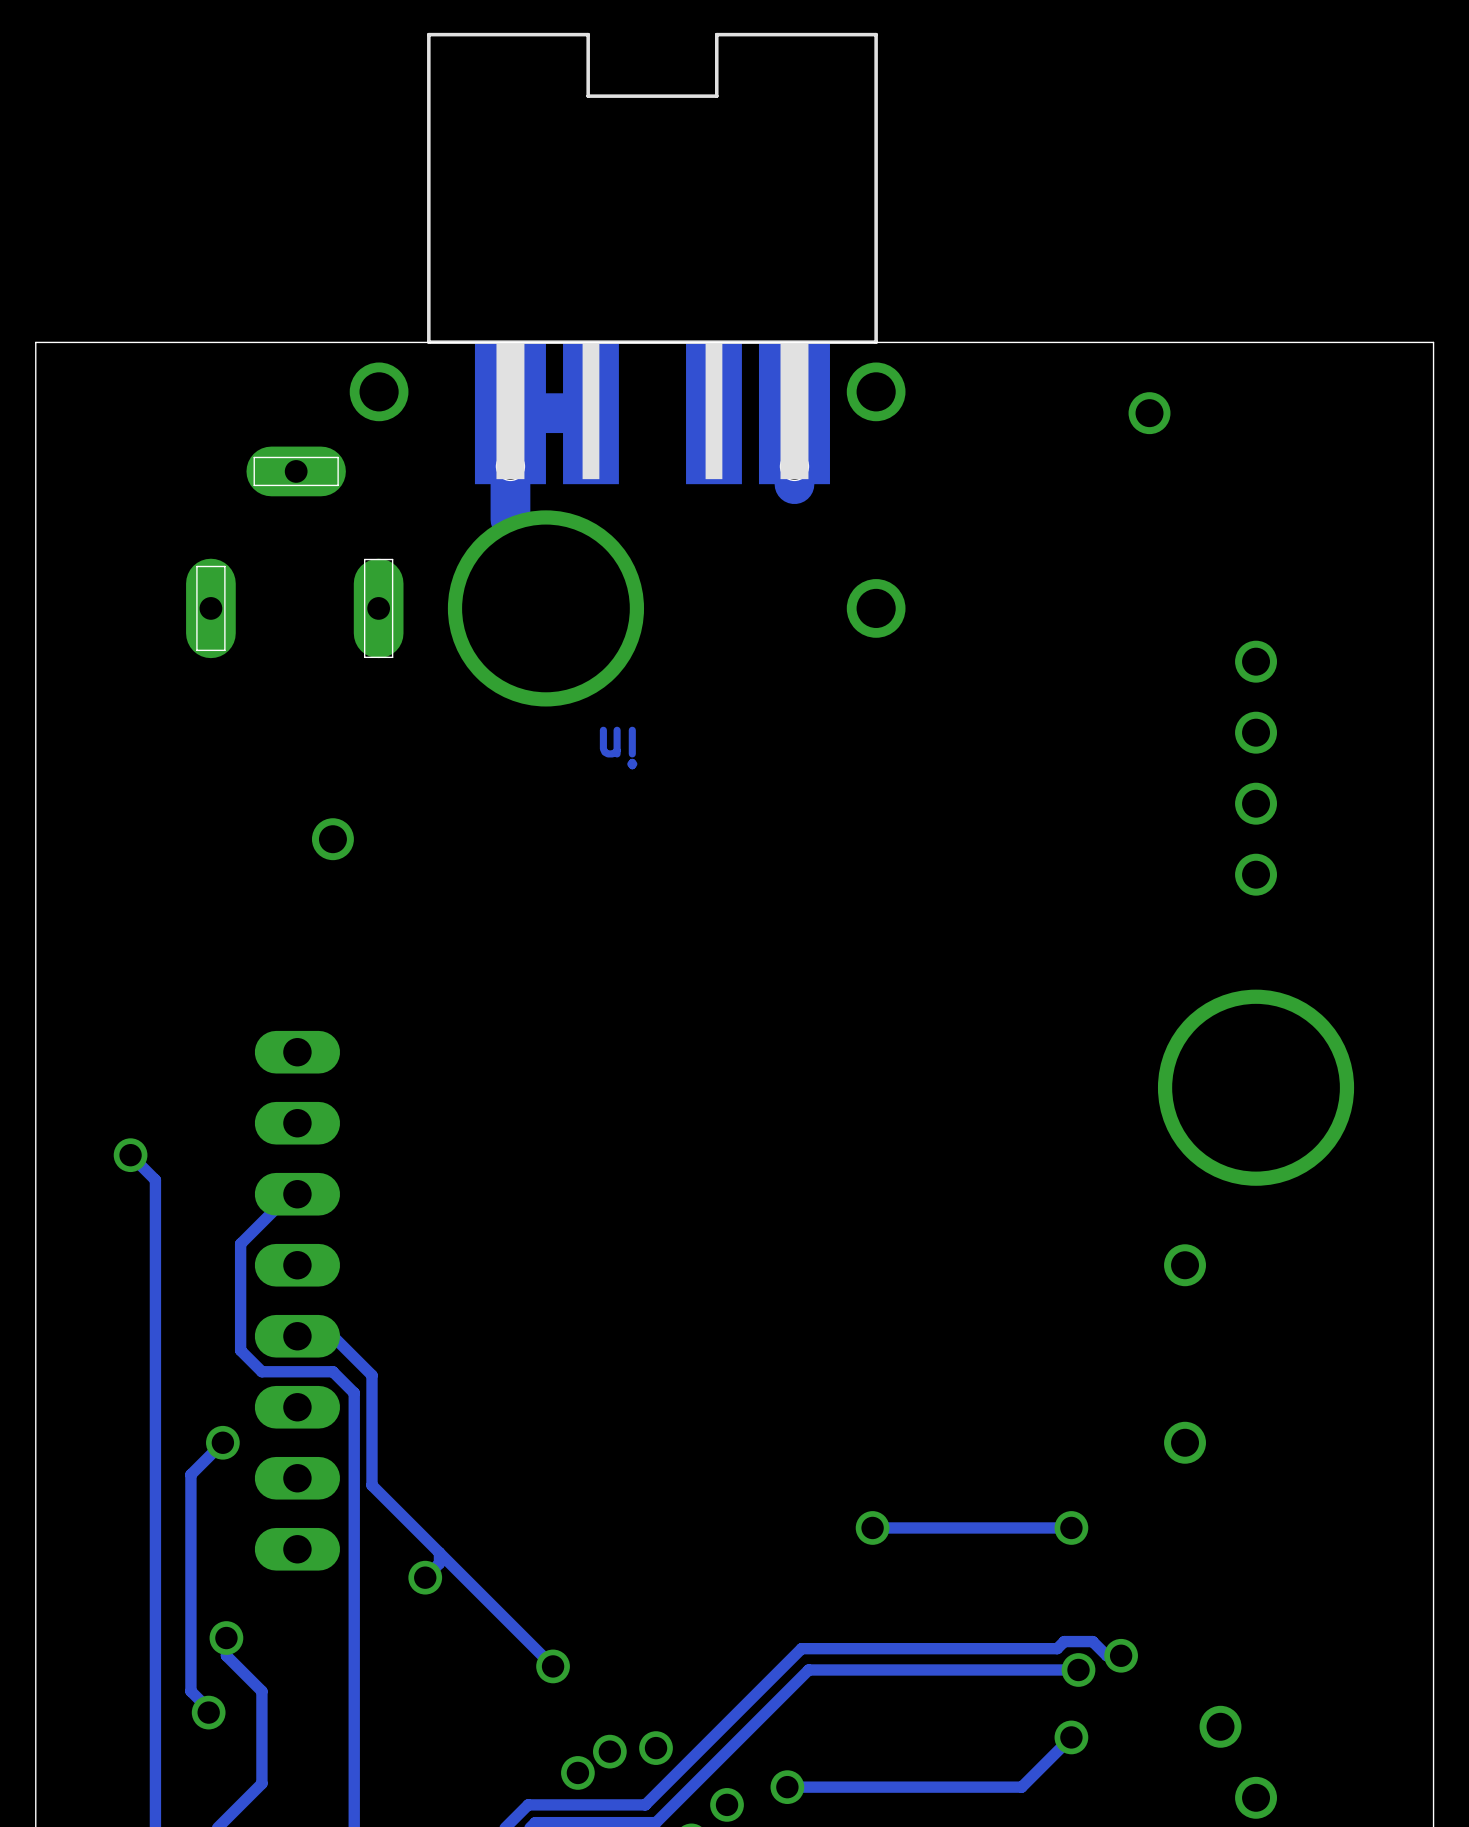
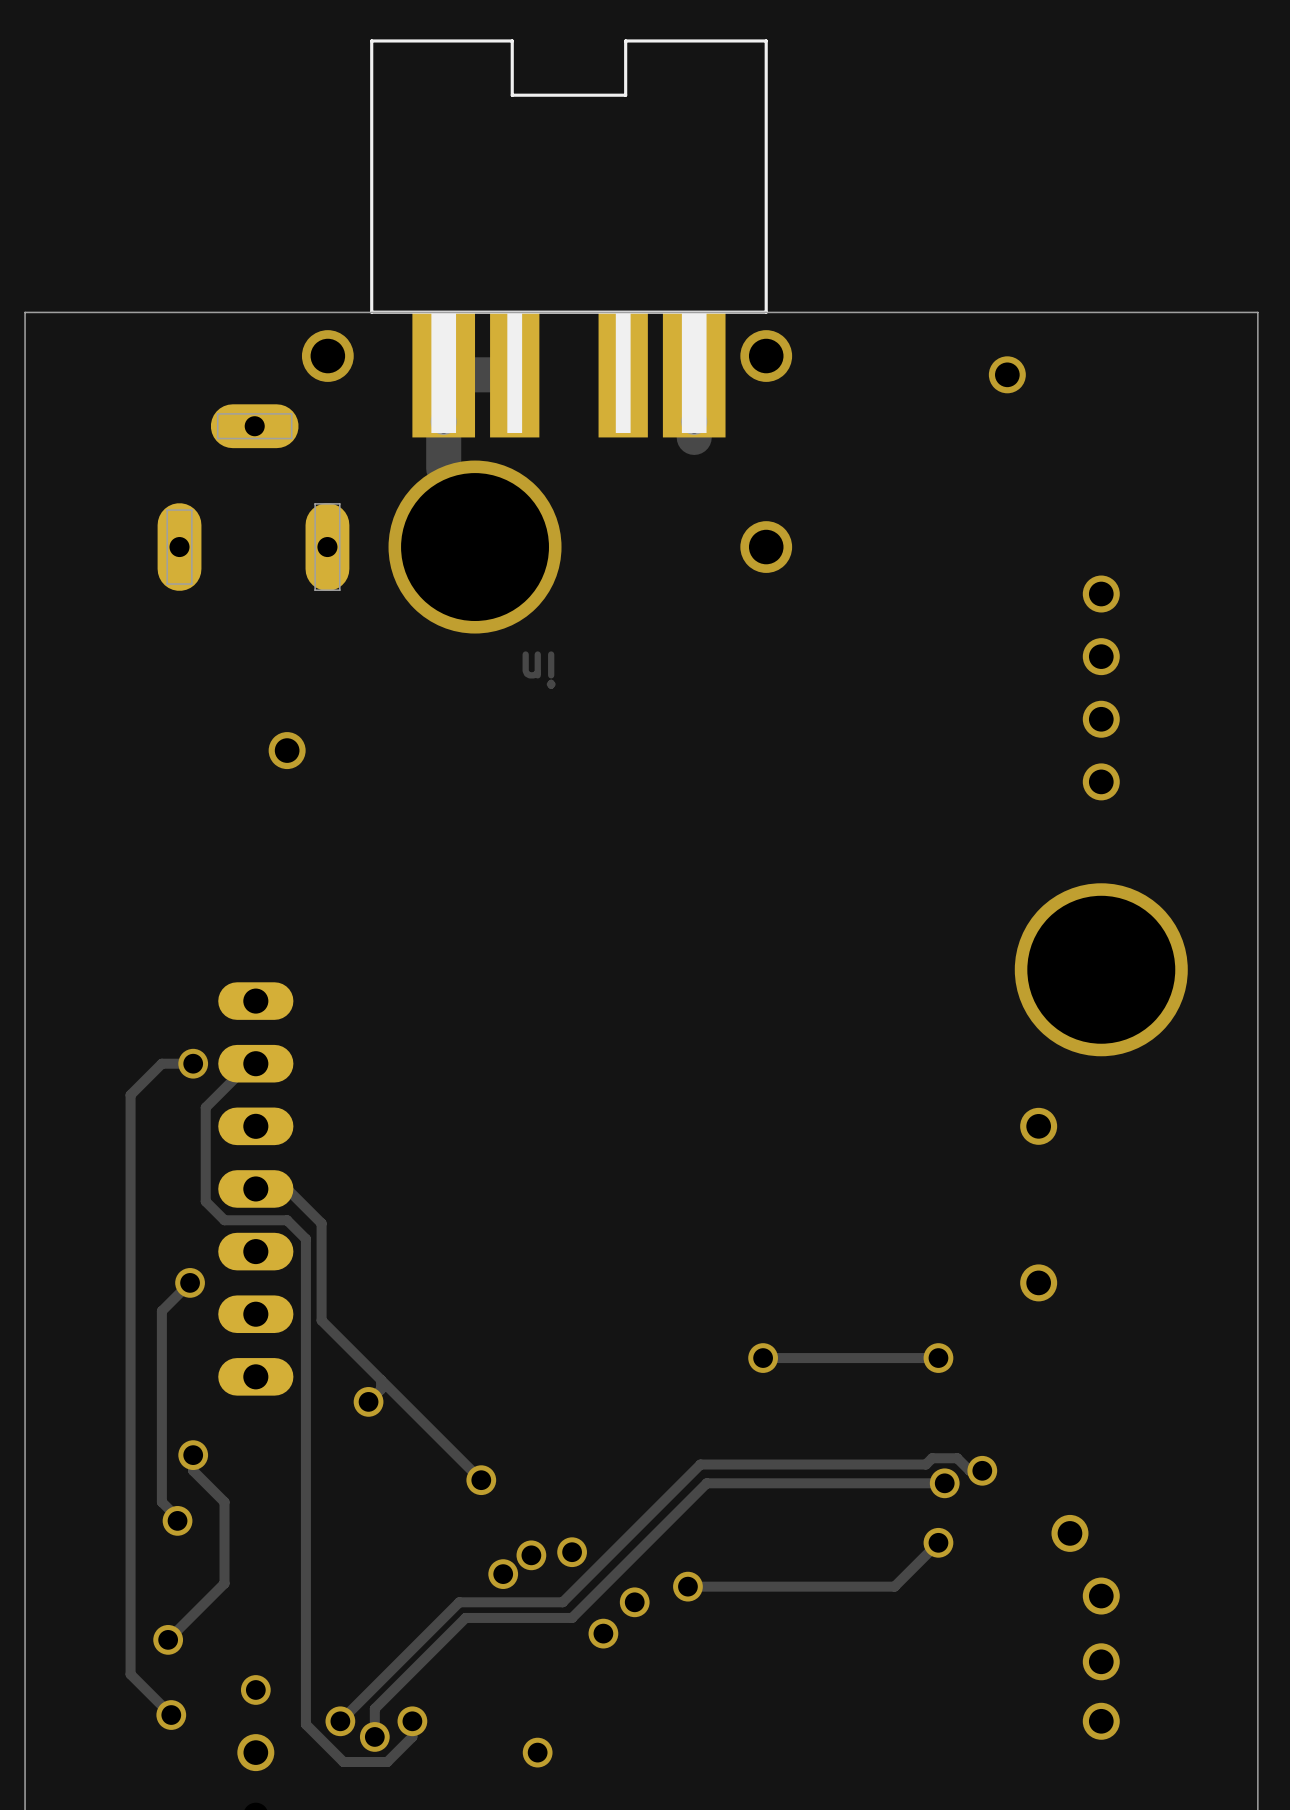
track: (130, 1155) (155, 1180) (155, 1229) -> (193, 1063) (161, 1063) (130, 1095)
via position: (130, 1155) -> (193, 1063)
part: (297, 1300) -> none

